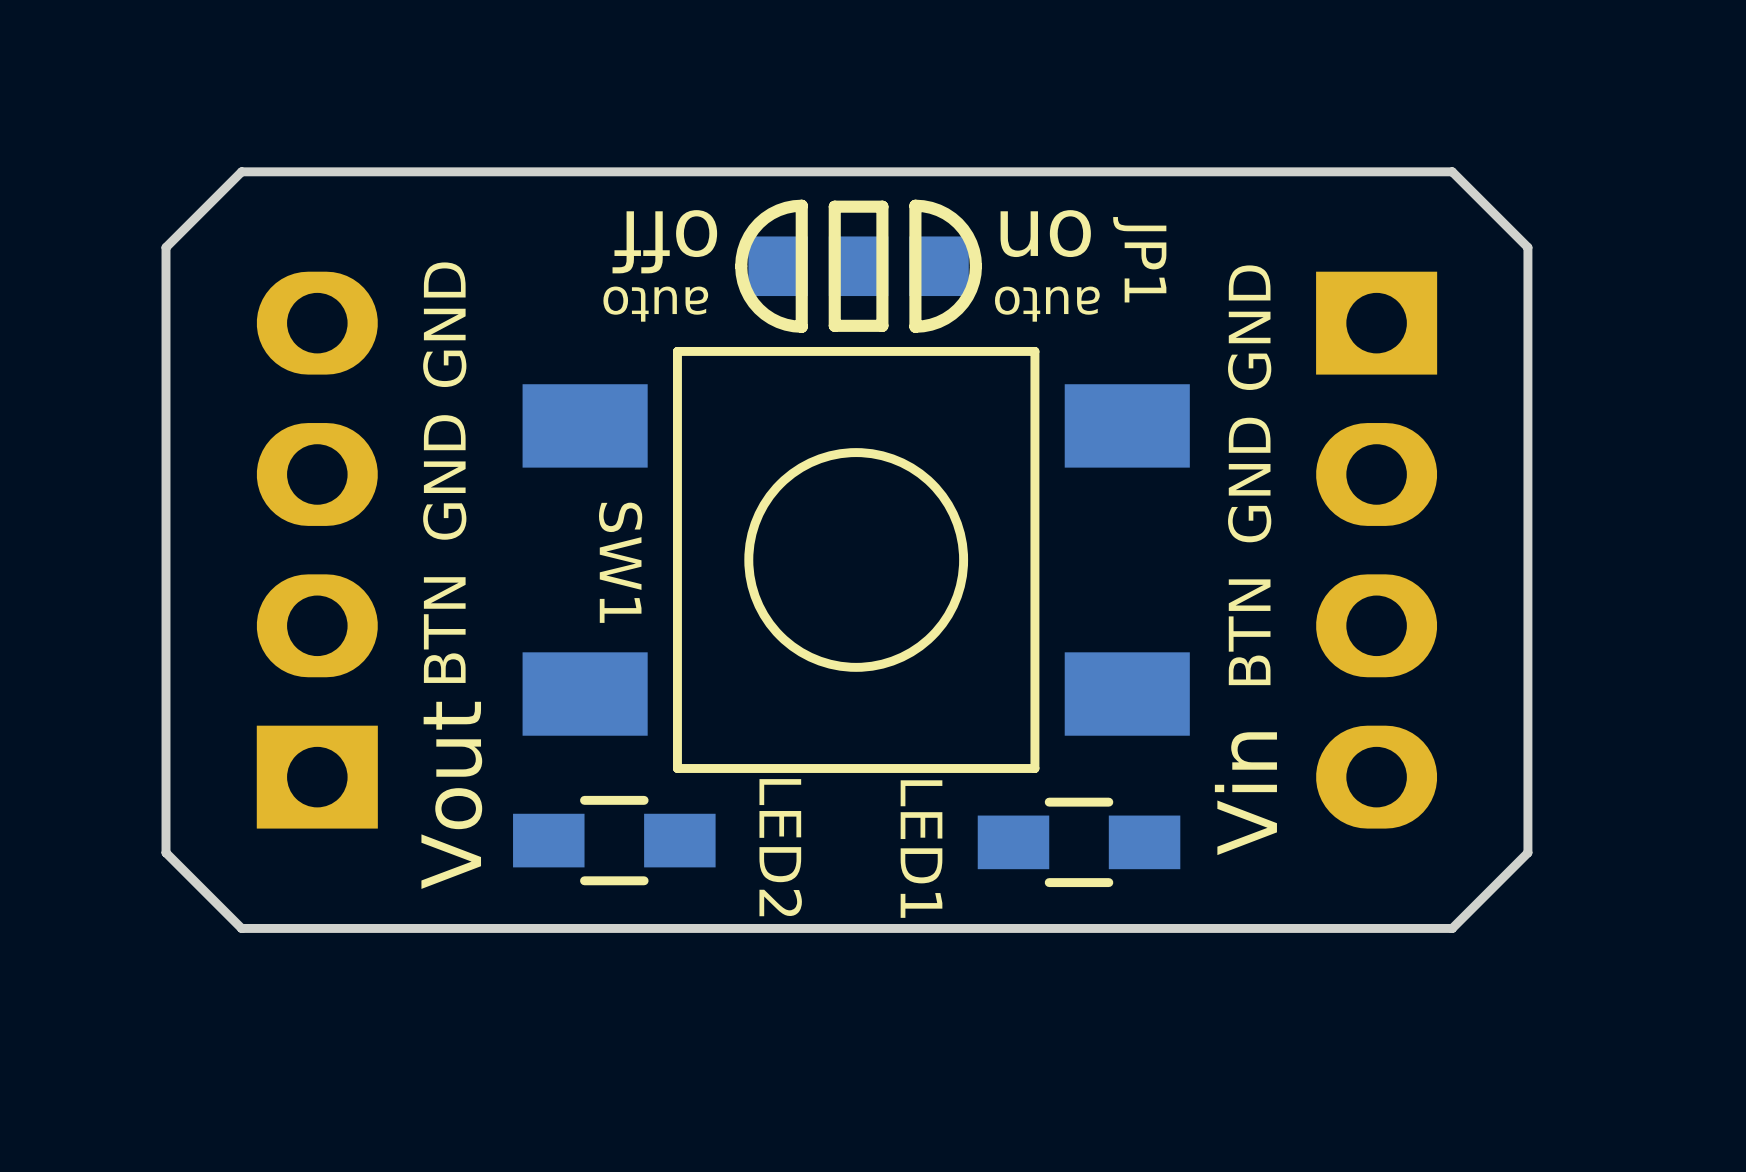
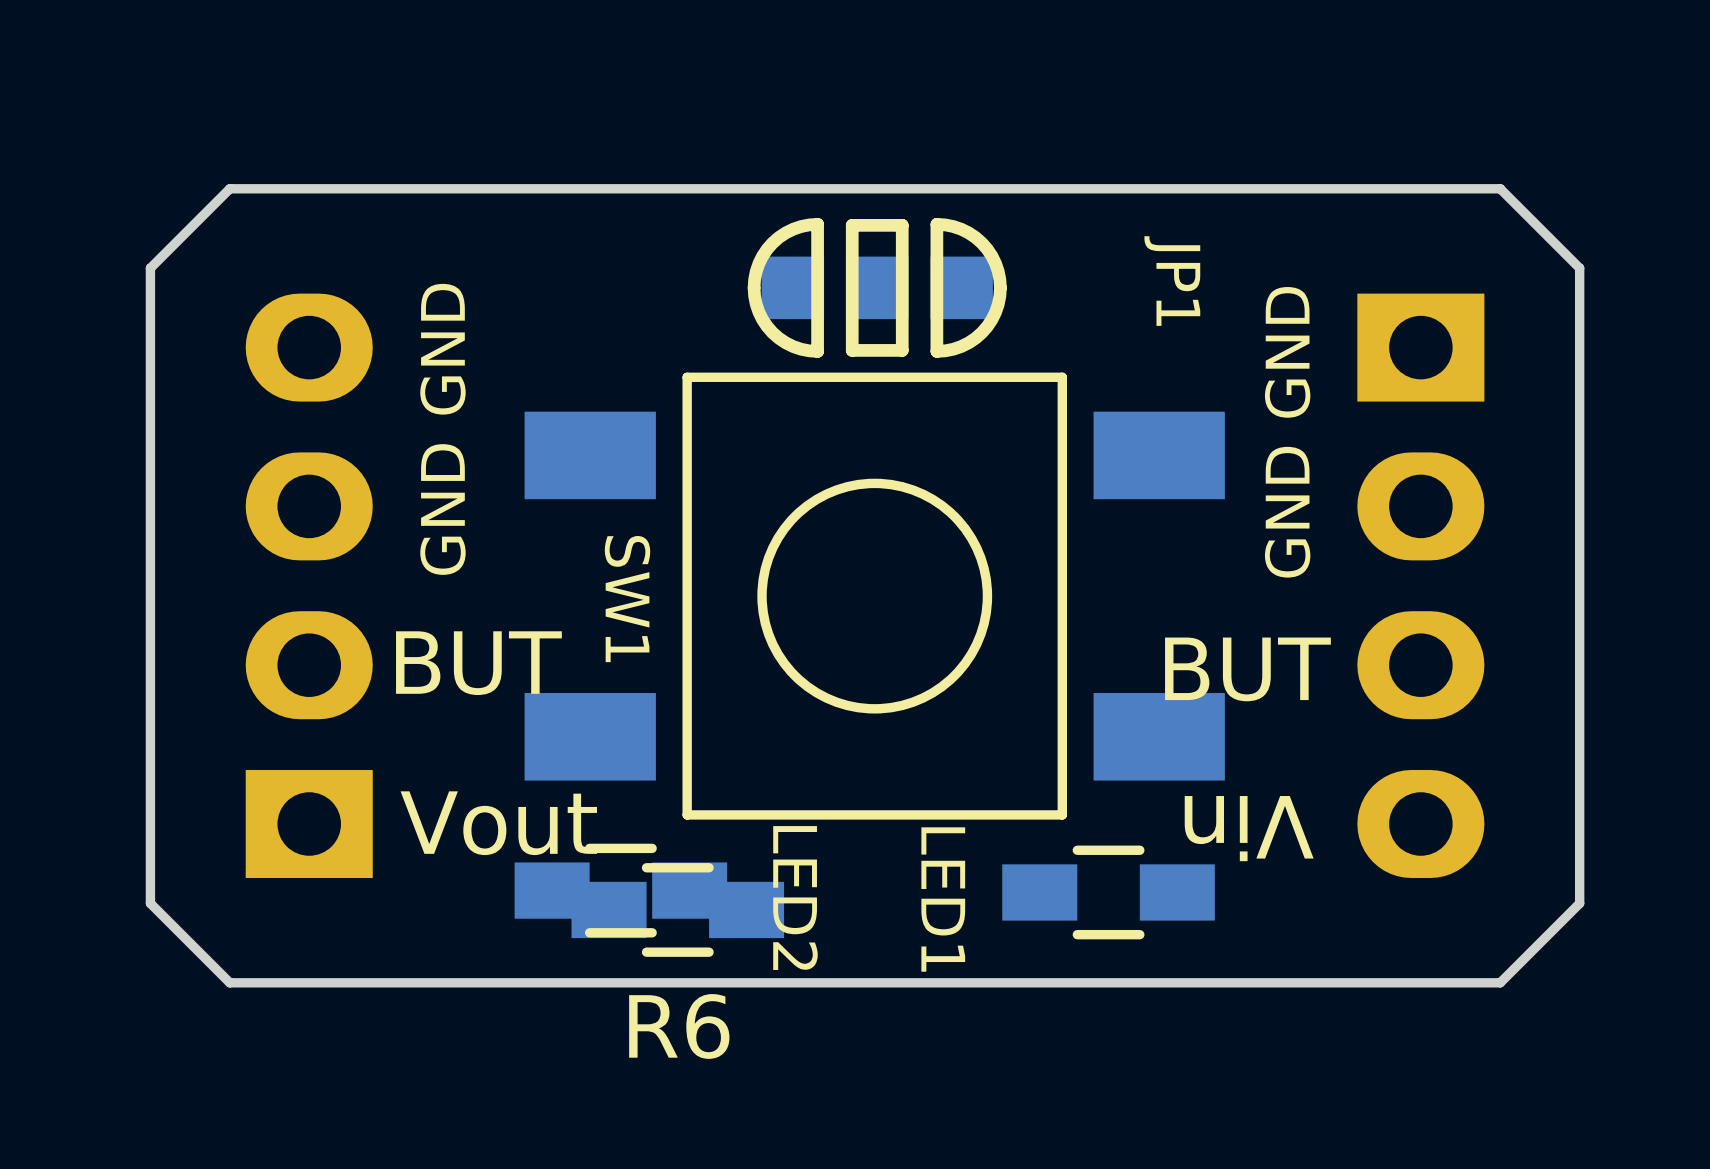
text: on (1045, 233) -> none
text: off (664, 241) -> none
text: auto (655, 304) -> none
text: auto (1047, 304) -> none
text: BTN (444, 630) -> BUT (478, 663)
text: BTN (1249, 632) -> BUT (1247, 669)
text rotation: 0° (1245, 793) -> 90° counterclockwise (1249, 828)
text rotation: 0° (451, 795) -> 90° clockwise (498, 823)
R6: none -> (677, 909)

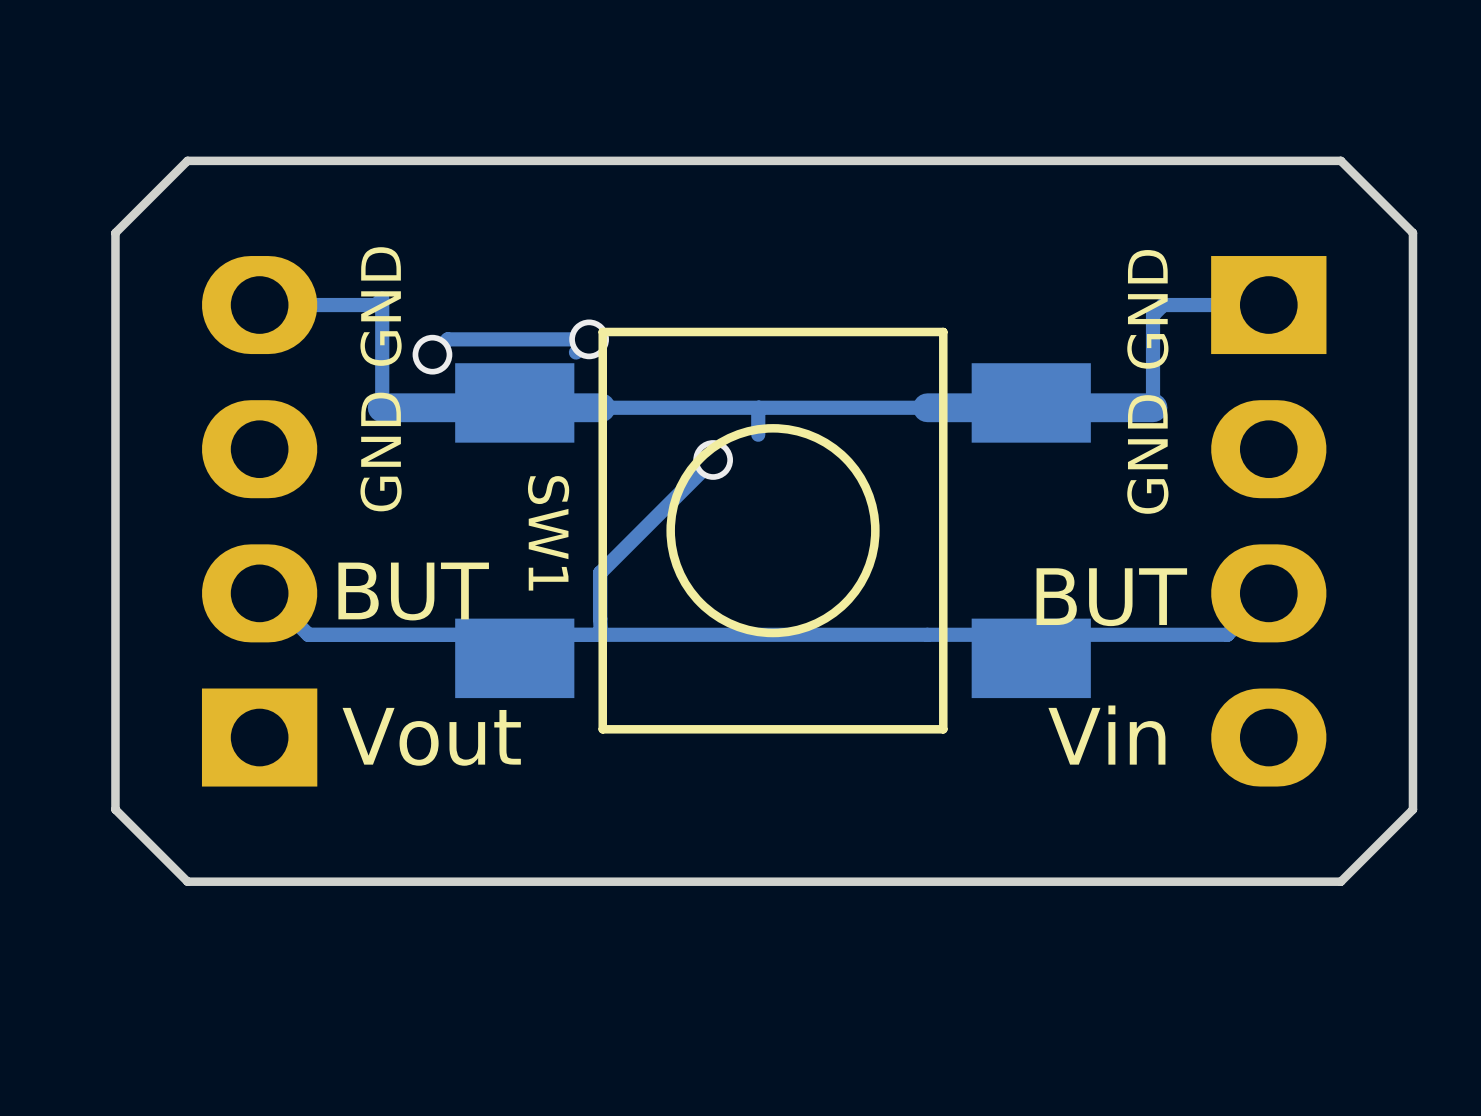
JP1: (877, 287) -> none
track: none -> (281, 306) (259, 305) (375, 305) (382, 298) (382, 407) (1153, 407) (1153, 315) (1163, 305) (1268, 305) (1251, 309)
via: none -> (589, 339)
track: none -> (576, 352) (589, 339) (447, 339) (432, 354)
via: none -> (432, 354)
track: none -> (758, 409) (758, 434)
track: none -> (713, 459) (600, 572) (601, 634)
via: none -> (713, 459)
track: none -> (259, 593) (268, 594) (308, 634) (601, 634)
track: none -> (1268, 593) (1227, 634) (601, 634)
text rotation: 0° (1249, 828) -> 180° (1106, 735)
LED2: (620, 890) -> none
LED1: (1108, 892) -> none
R6: (677, 909) -> none

